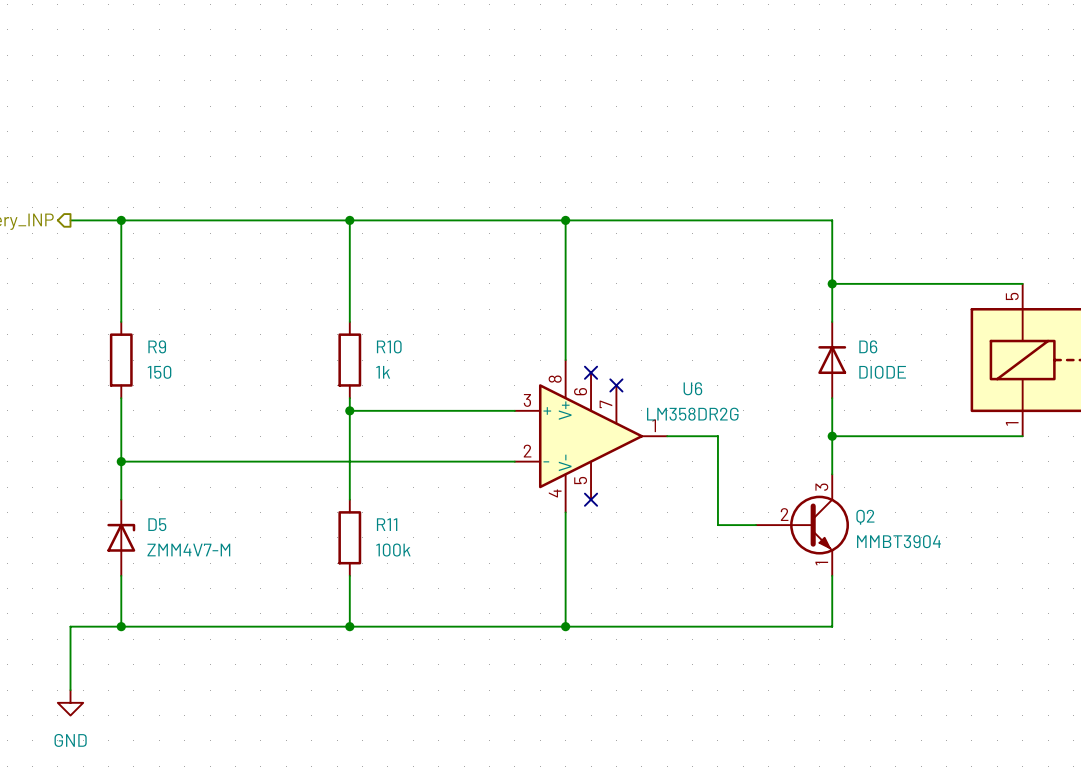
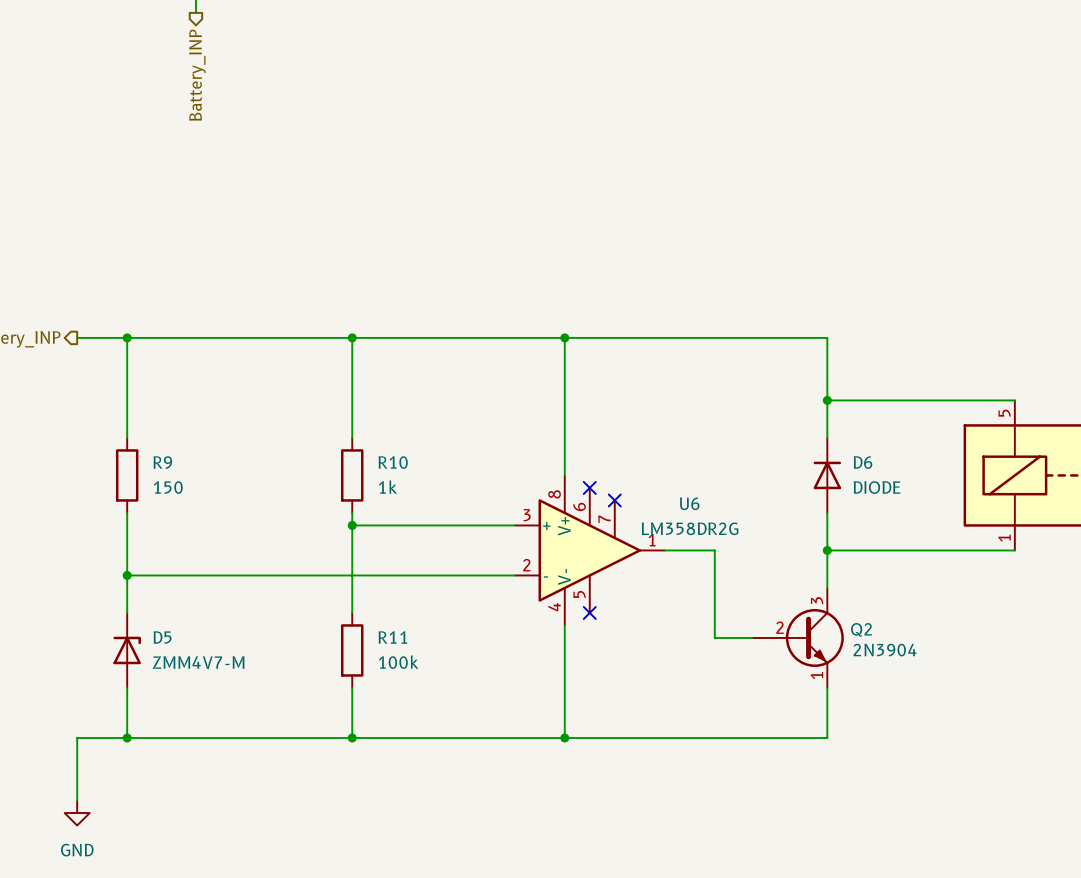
Q2 value: MMBT3904 (898, 541) -> 2N3904 (885, 650)

